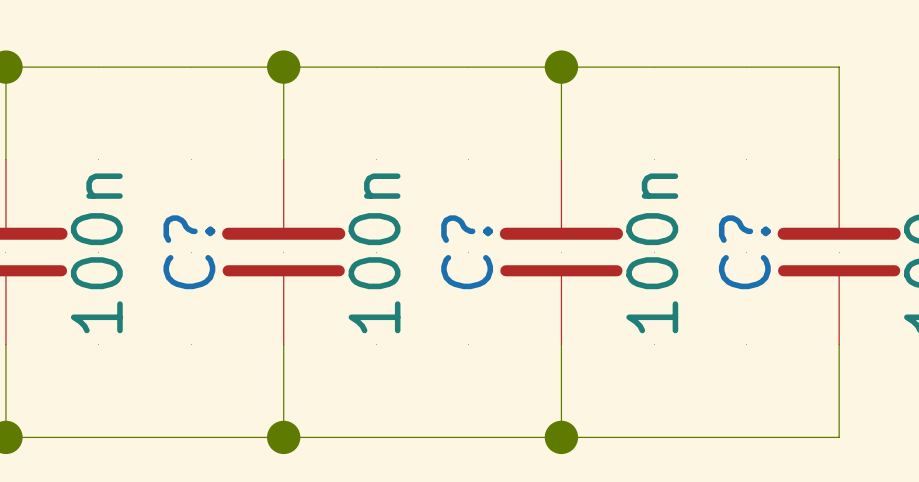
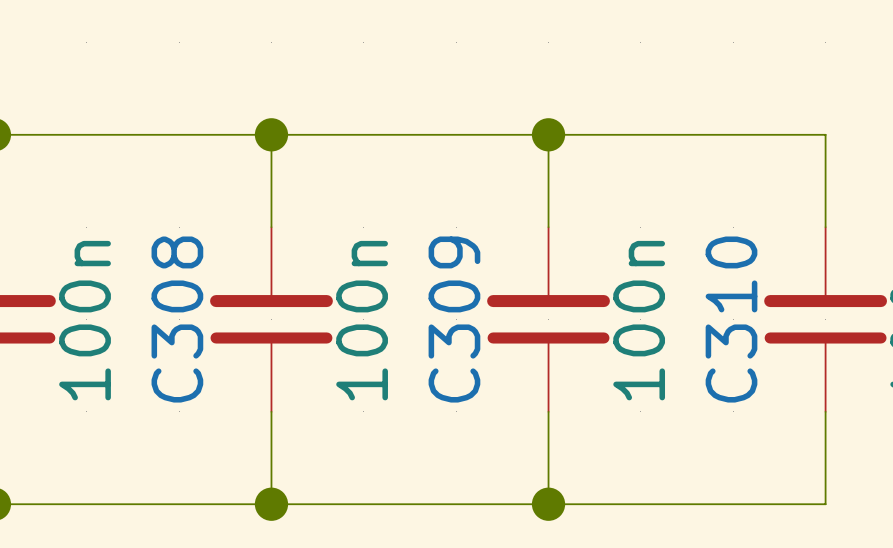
C? name: C? (189, 252) -> C308 (177, 319)
C? name: C? (467, 252) -> C309 (454, 319)
C? name: C? (744, 252) -> C310 (731, 319)

